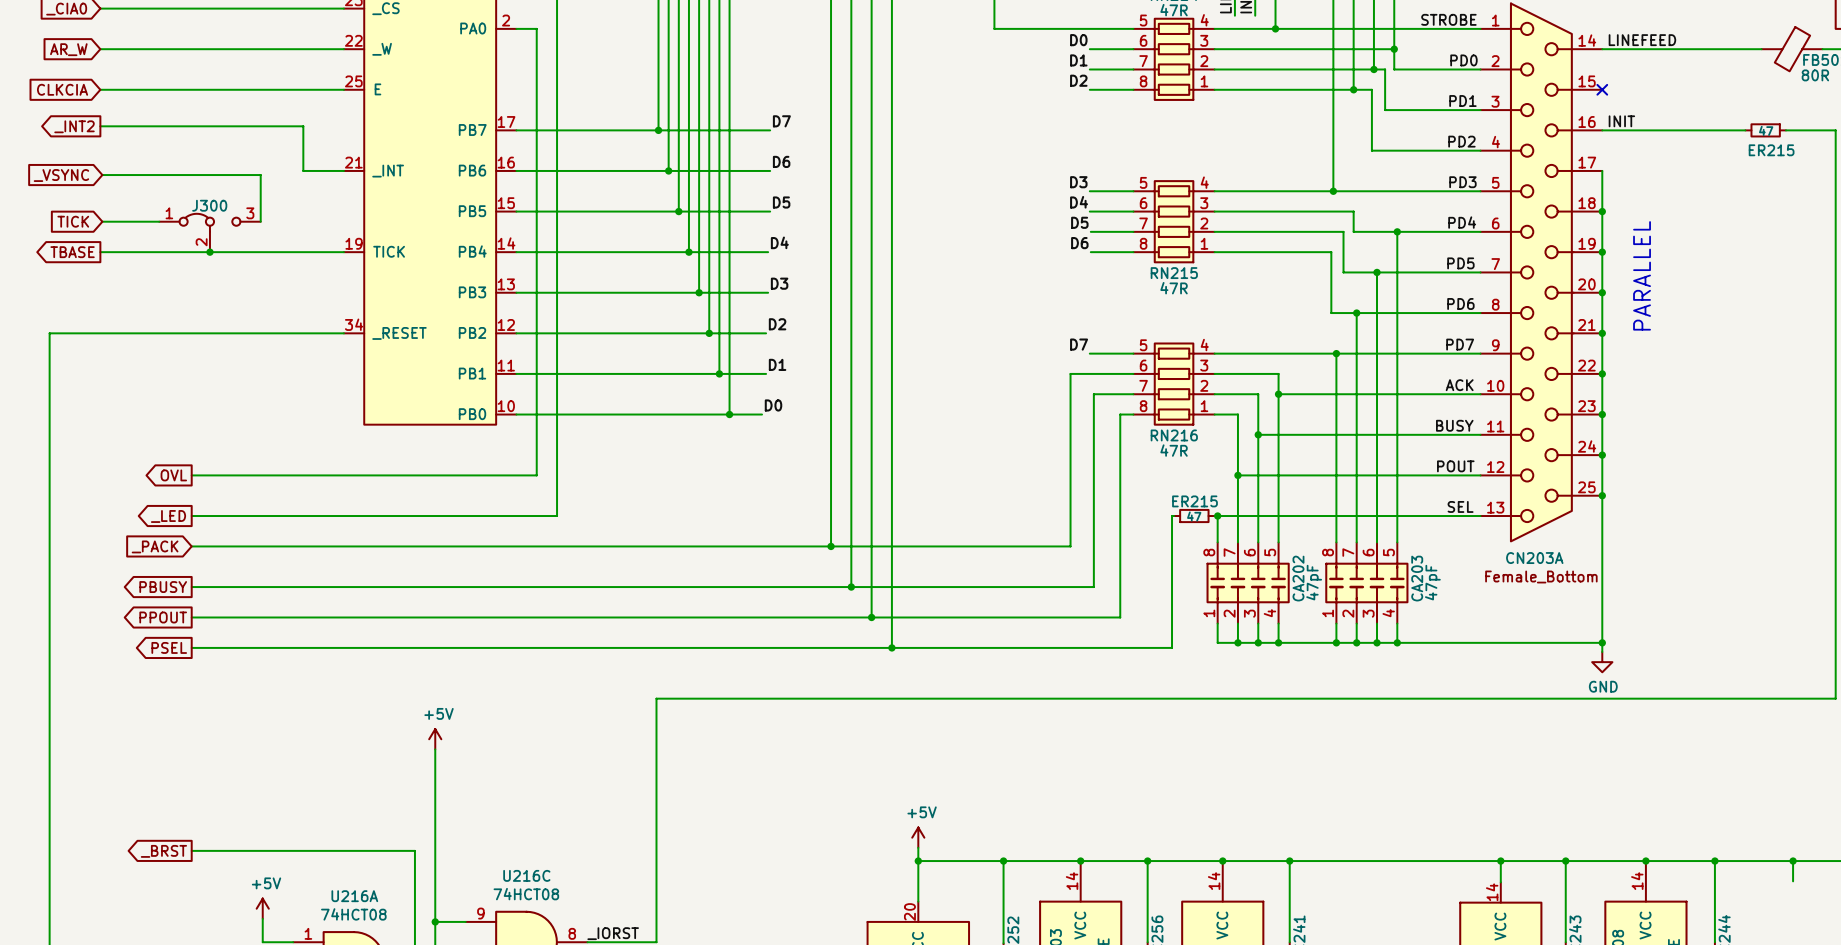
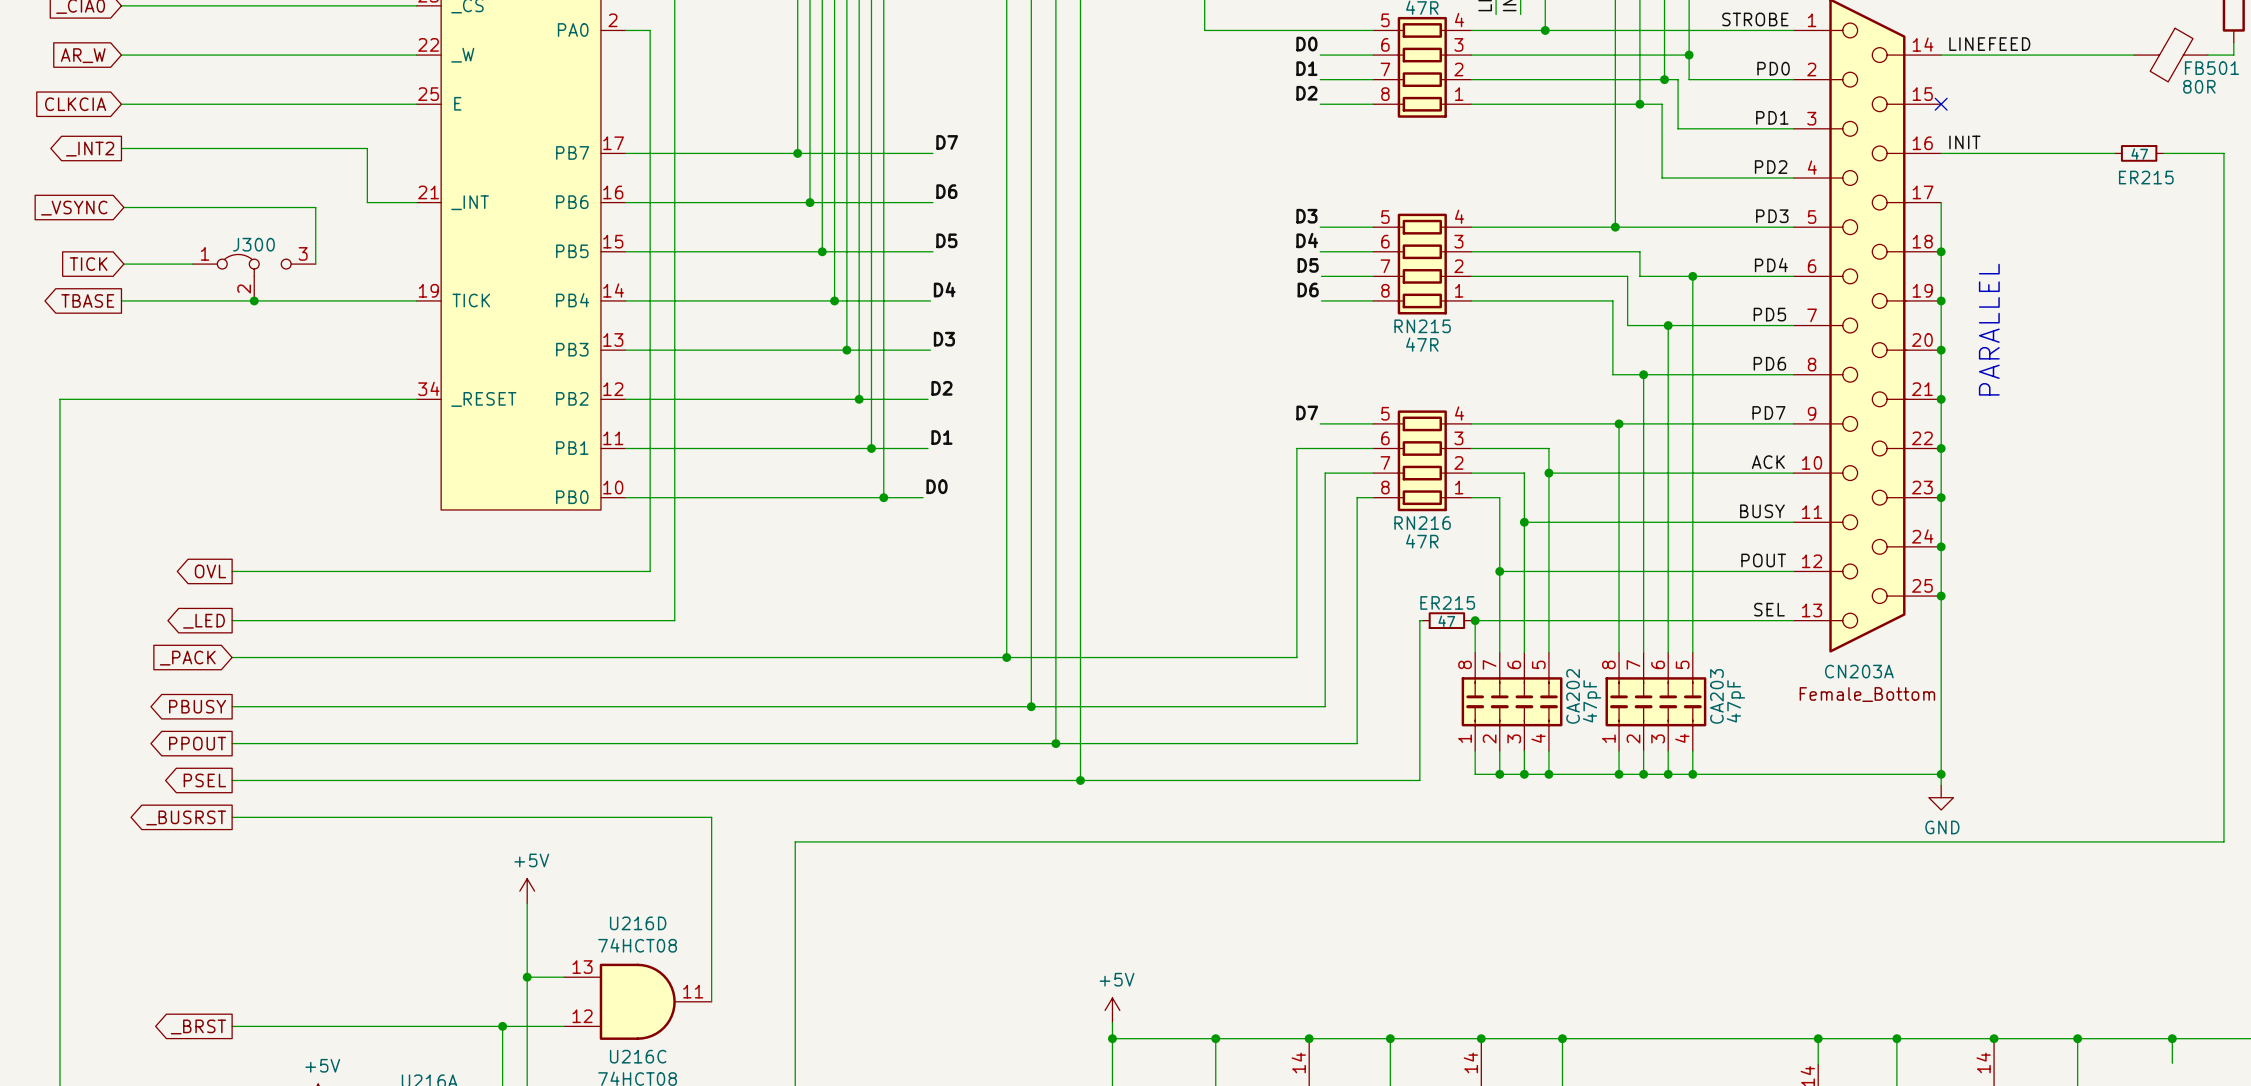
global label: none -> _BUSRST (186, 817)
wire: none -> (232, 817) (711, 817) (711, 1001)
wire: none -> (527, 977) (564, 977)
junction: none -> (527, 977)
U216D: none -> 74HCT08 (637, 1001)
wire: none -> (502, 1026) (564, 1026)
junction: none -> (502, 1026)

